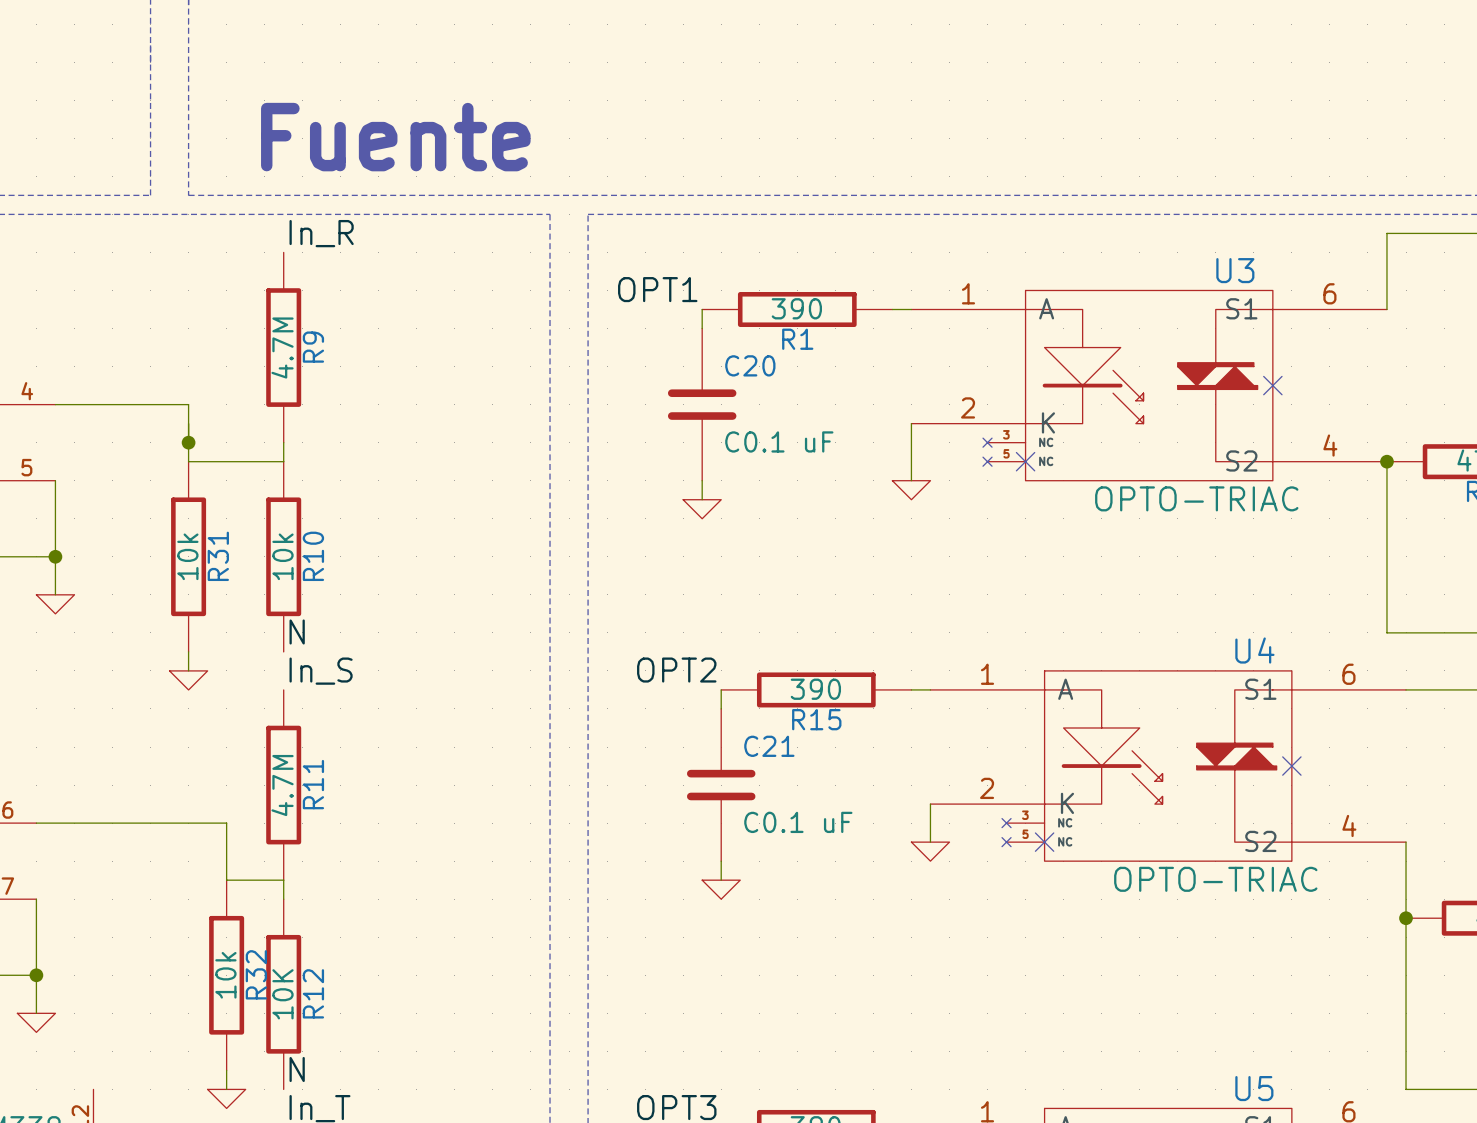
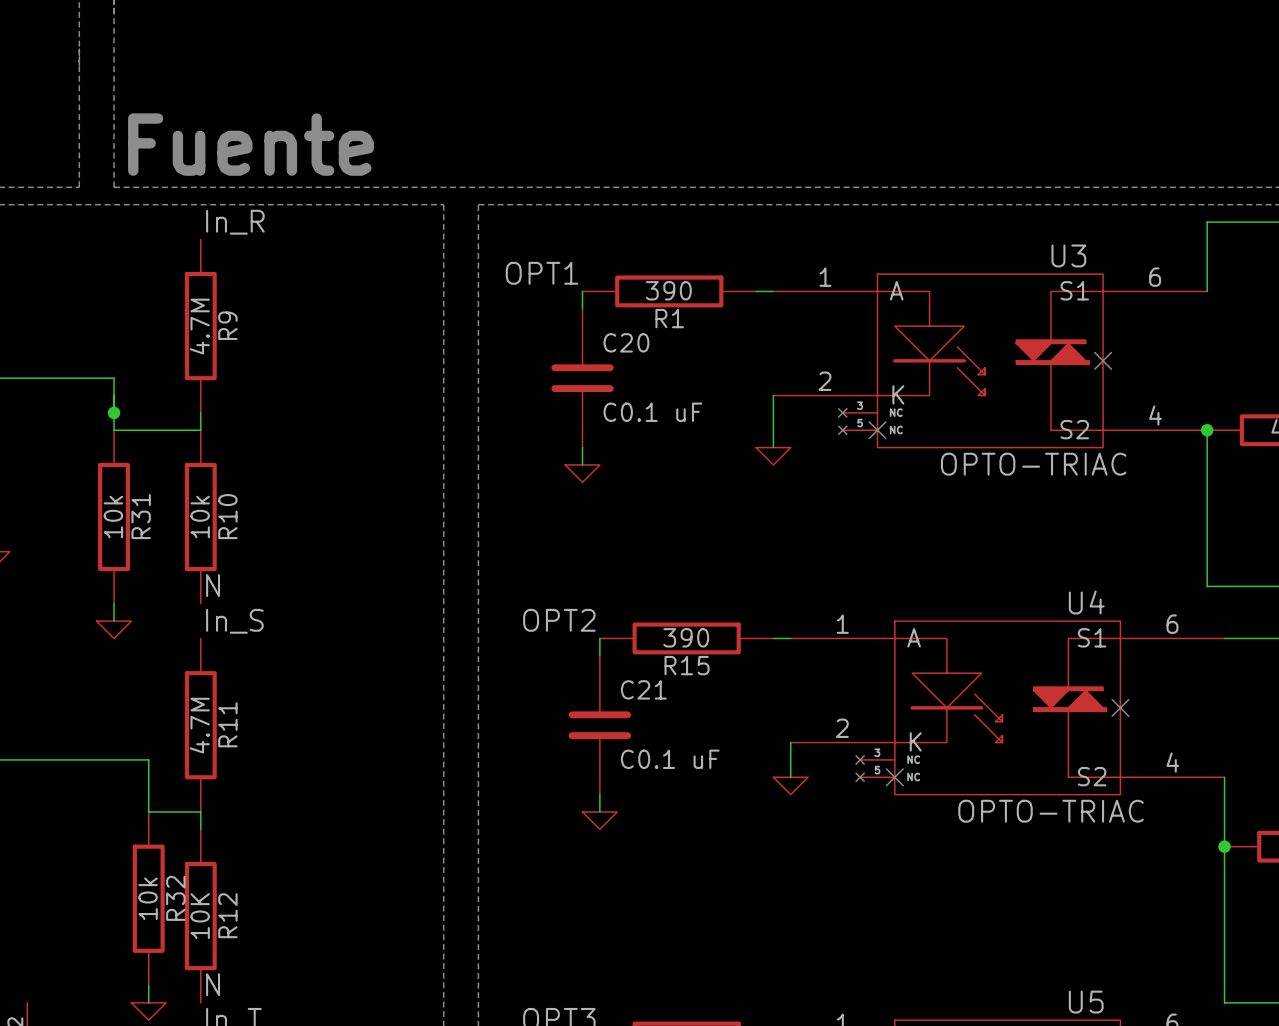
text position: Fuente (395, 137) -> Fuente (251, 144)

